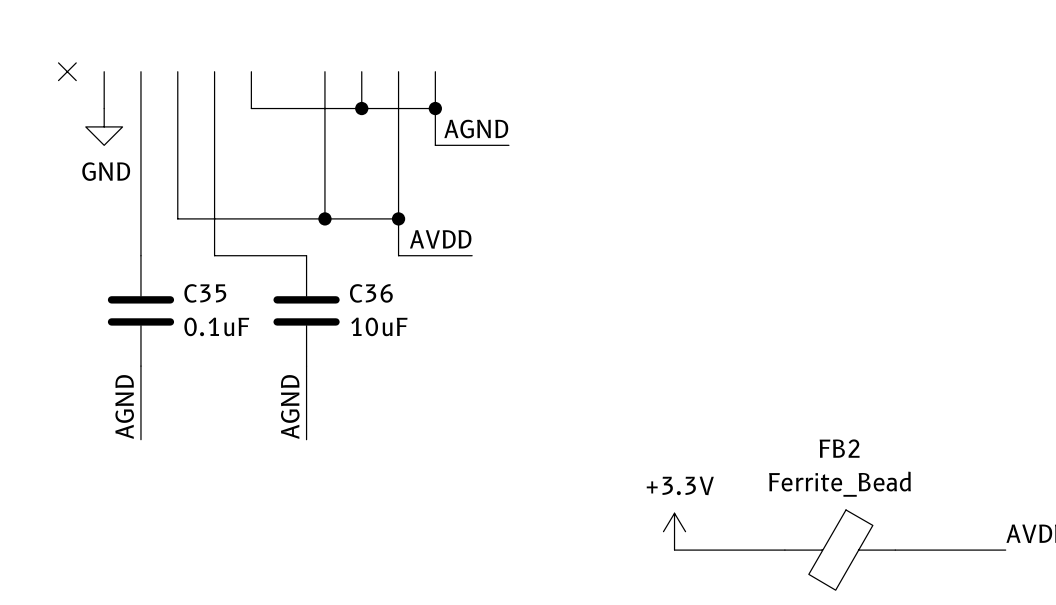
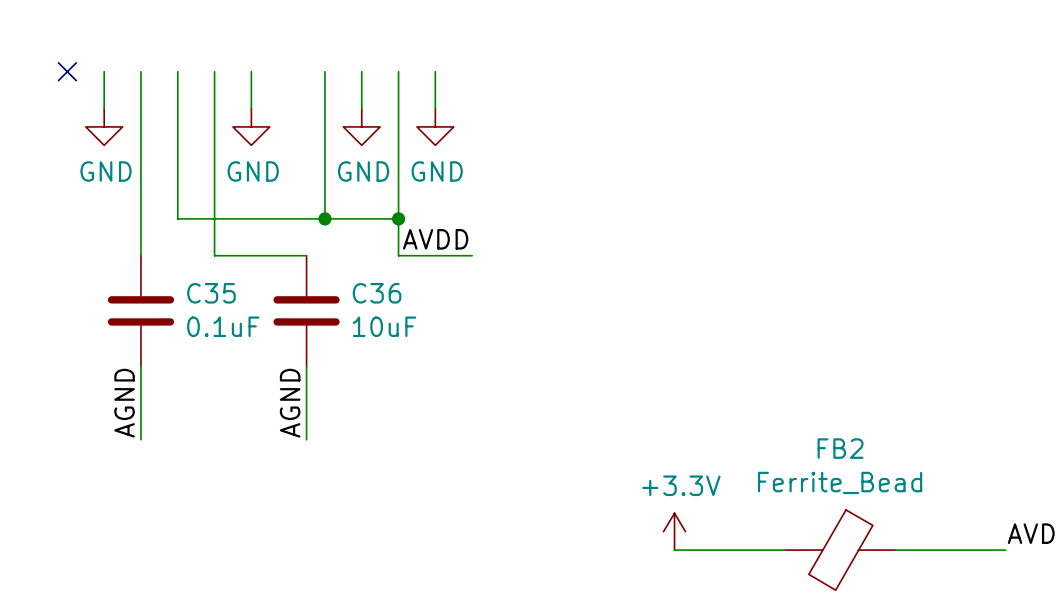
wire: (251, 108) (435, 108) (435, 145) (508, 145) -> none
junction: (361, 108) -> none
junction: (435, 108) -> none
power symbol: none -> GND (251, 126)
power symbol: none -> GND (361, 126)
power symbol: none -> GND (435, 126)
label: AGND (476, 129) -> none

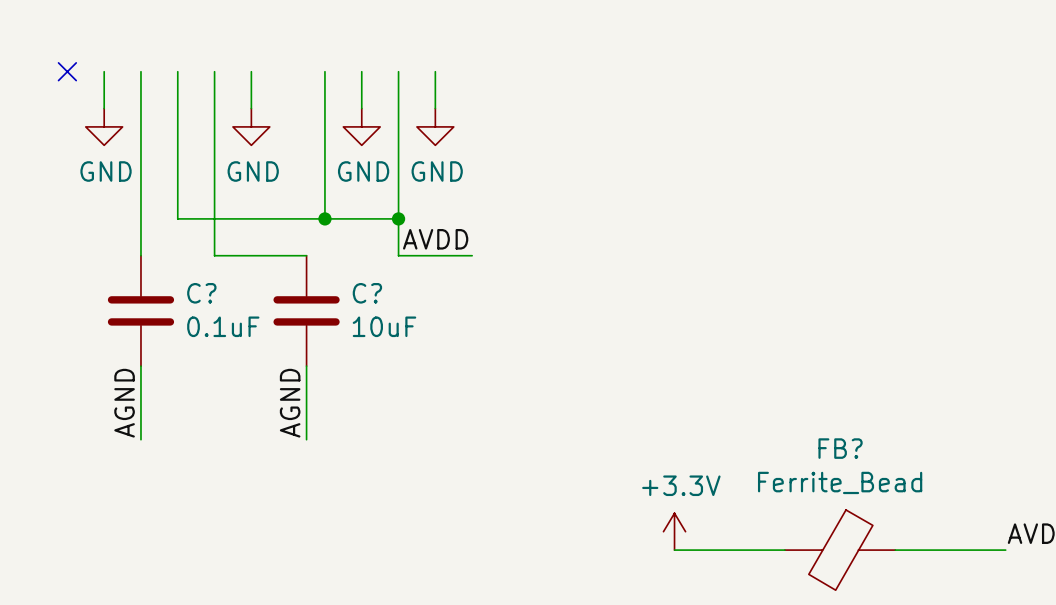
C35 name: C35 (211, 293) -> C? (201, 293)
C36 name: C36 (377, 293) -> C? (367, 293)
FB2 name: FB2 (840, 448) -> FB? (840, 448)

